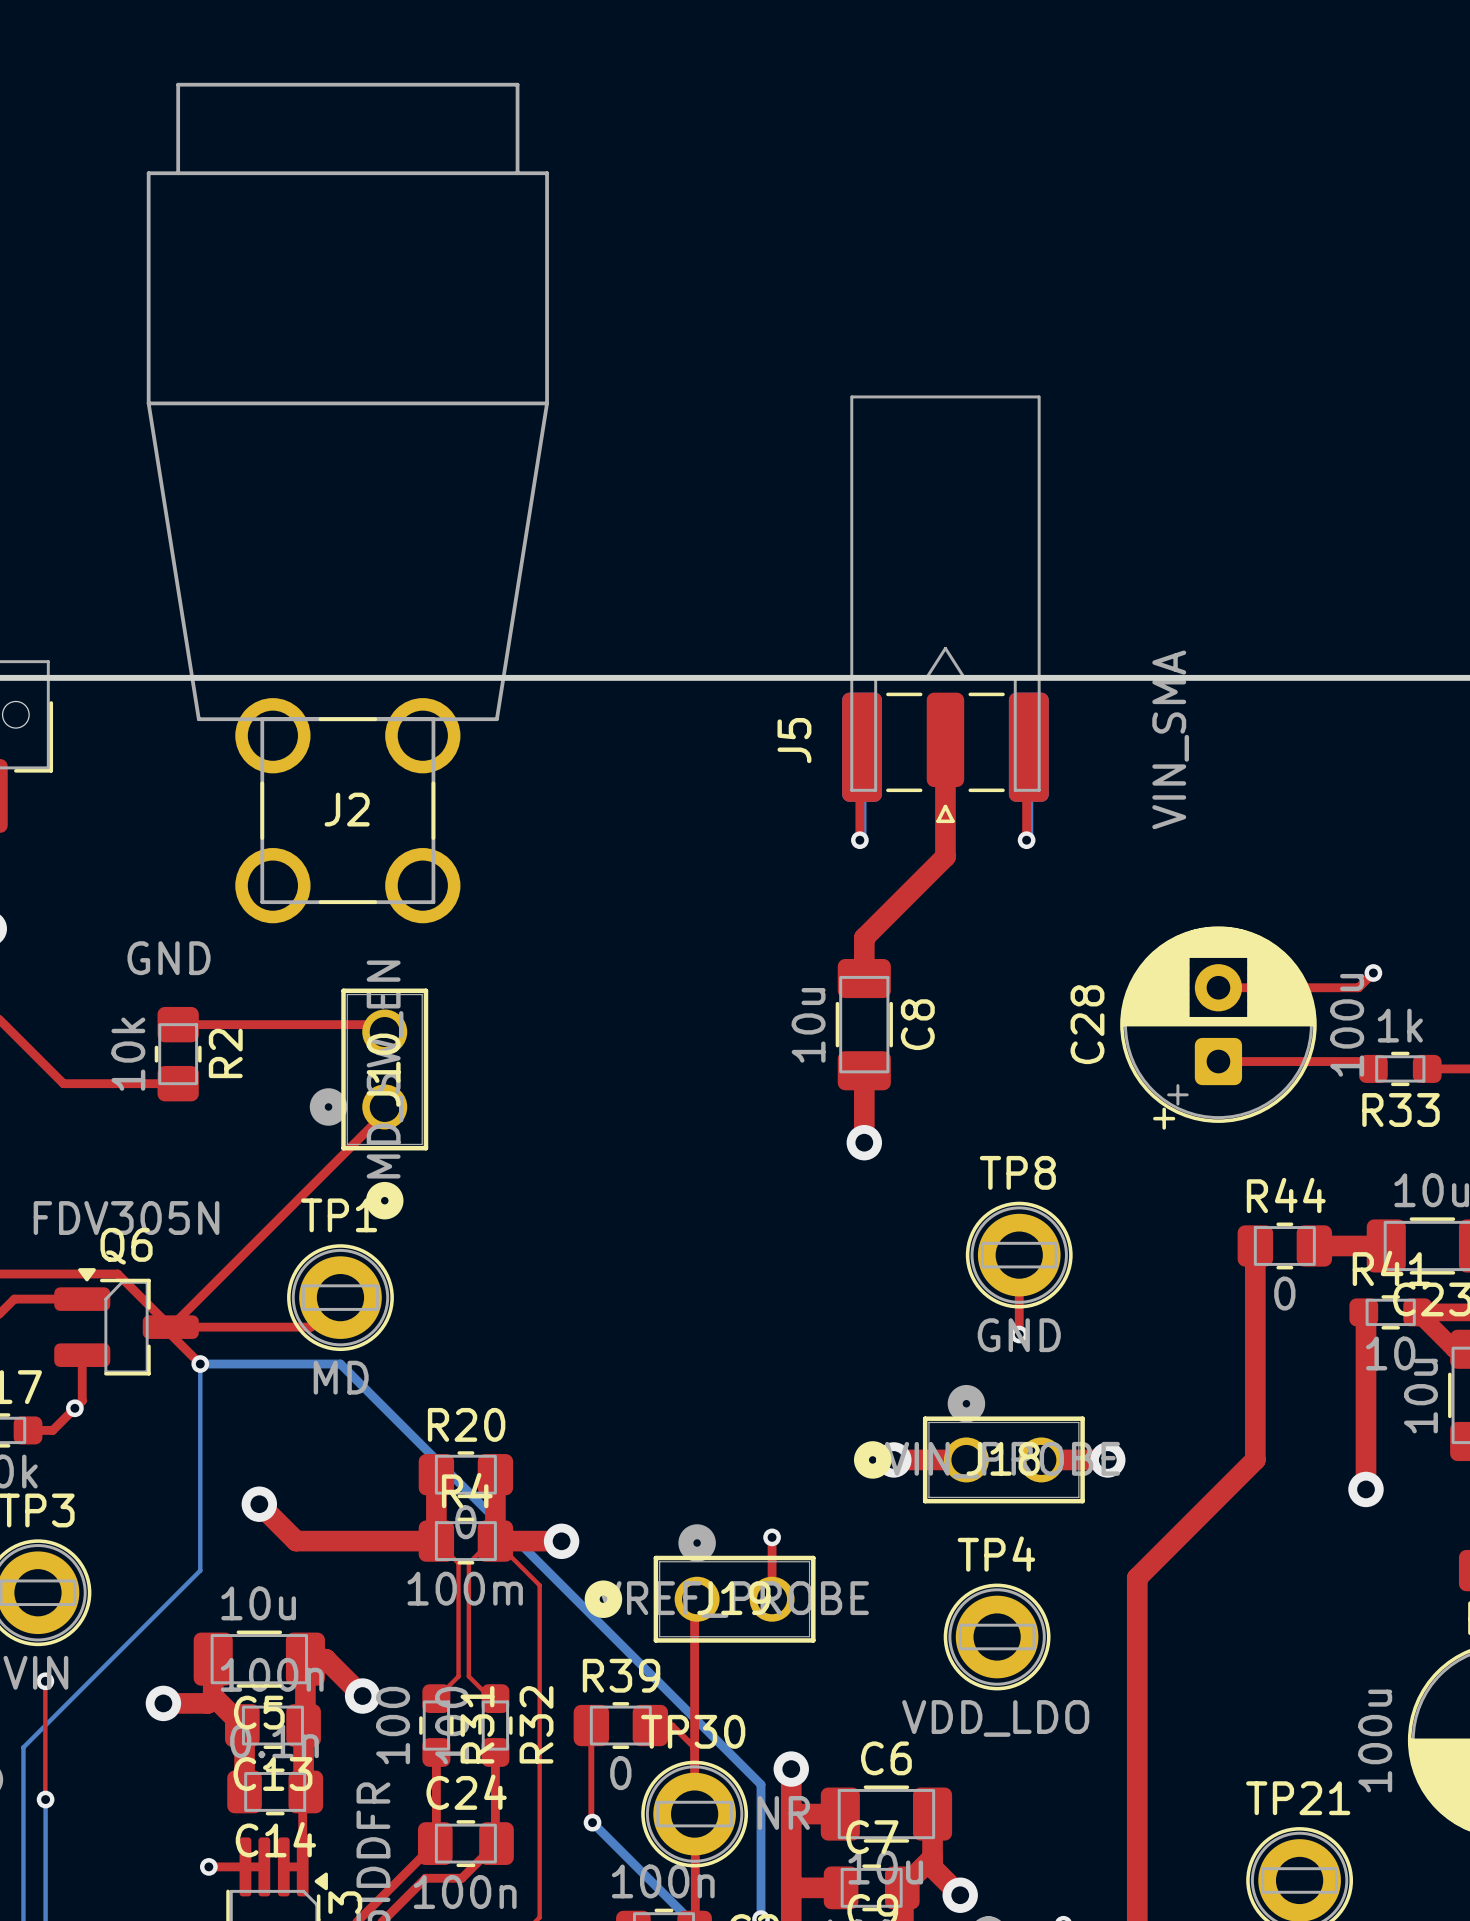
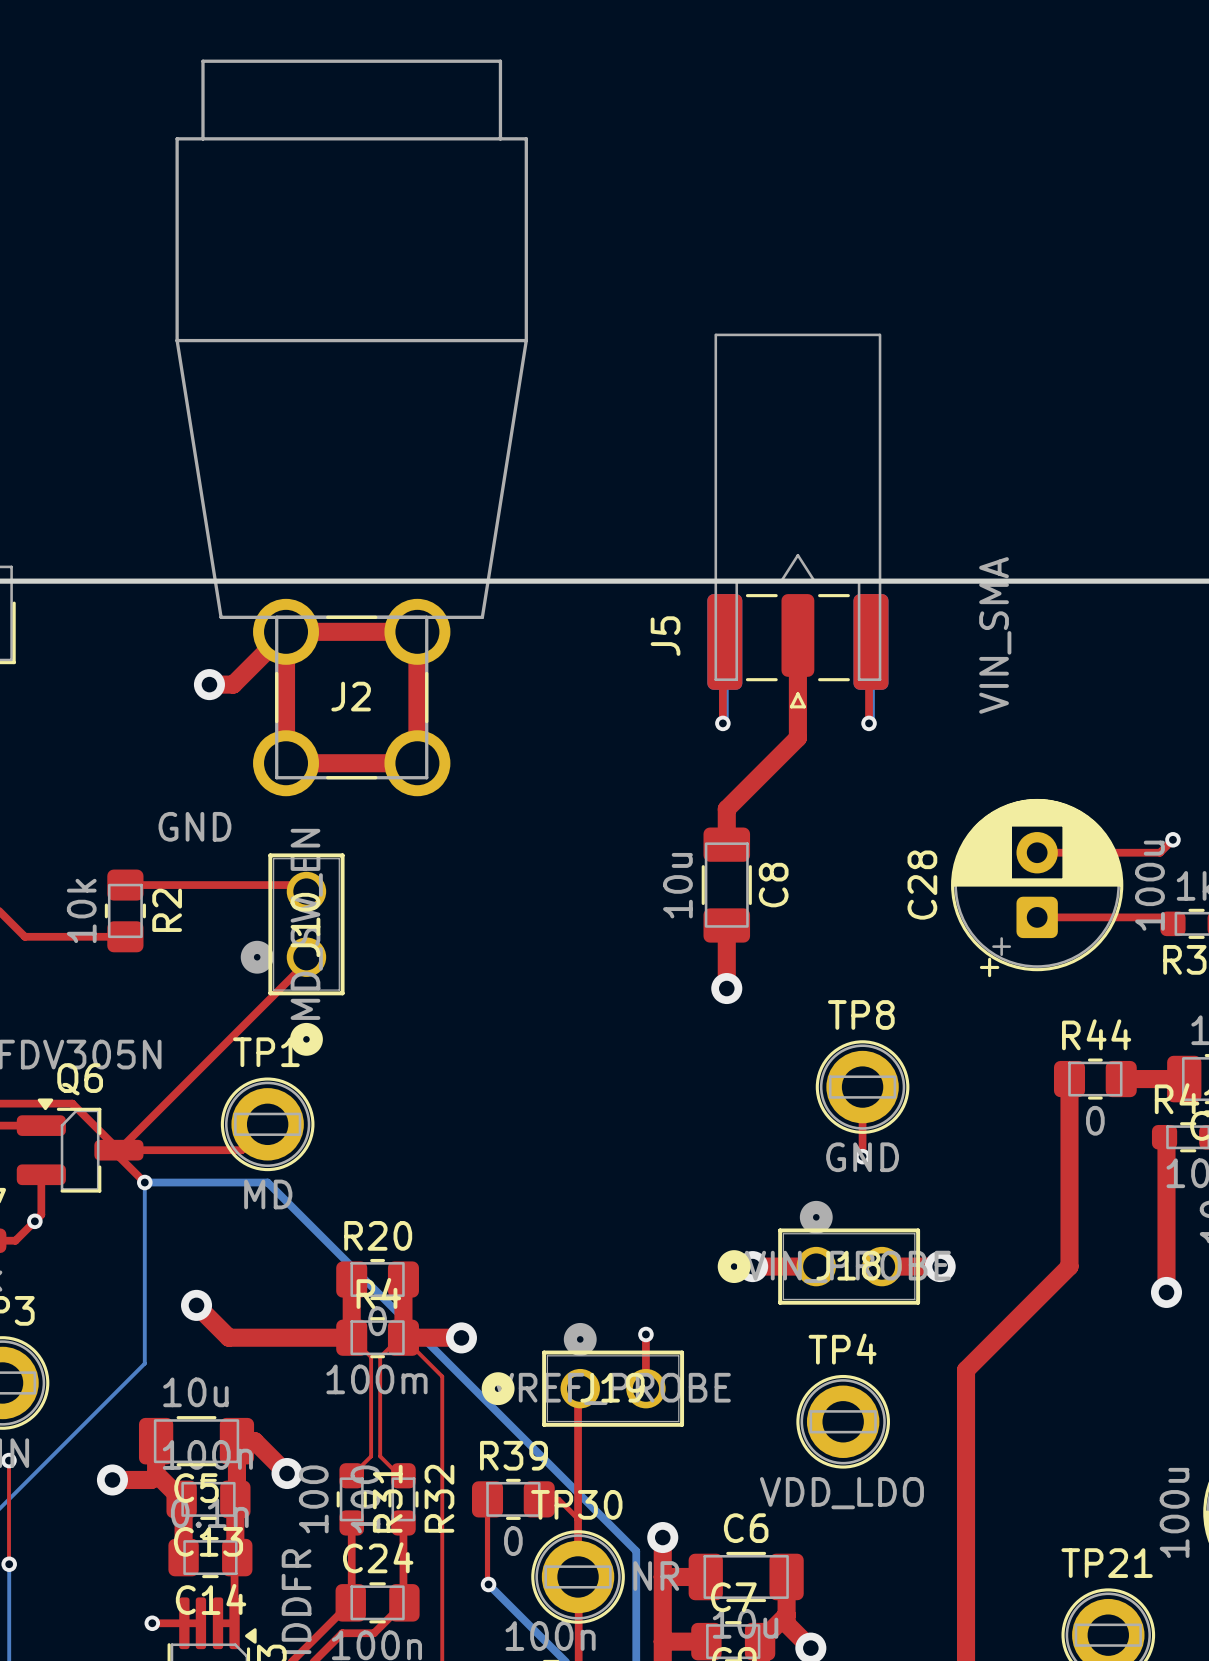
J2 position: (347, 503) -> (351, 427)
top track: none -> (286, 631) (233, 684) (209, 684)
top track: none -> (286, 631) (417, 631) (417, 763) (286, 763) (286, 631)
via: none -> (209, 684)

